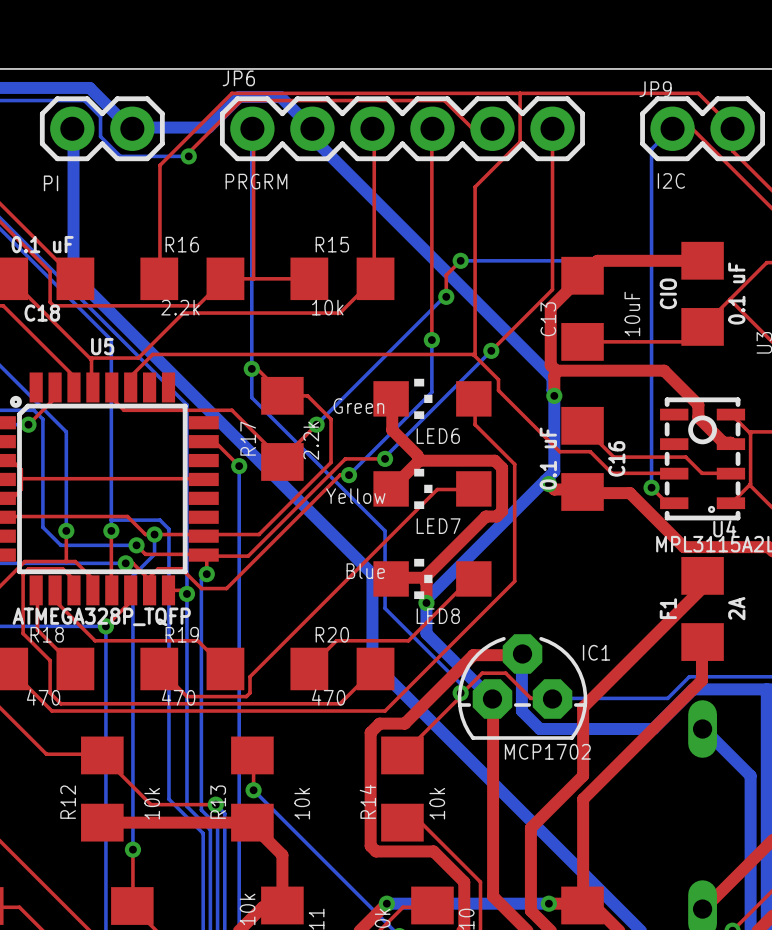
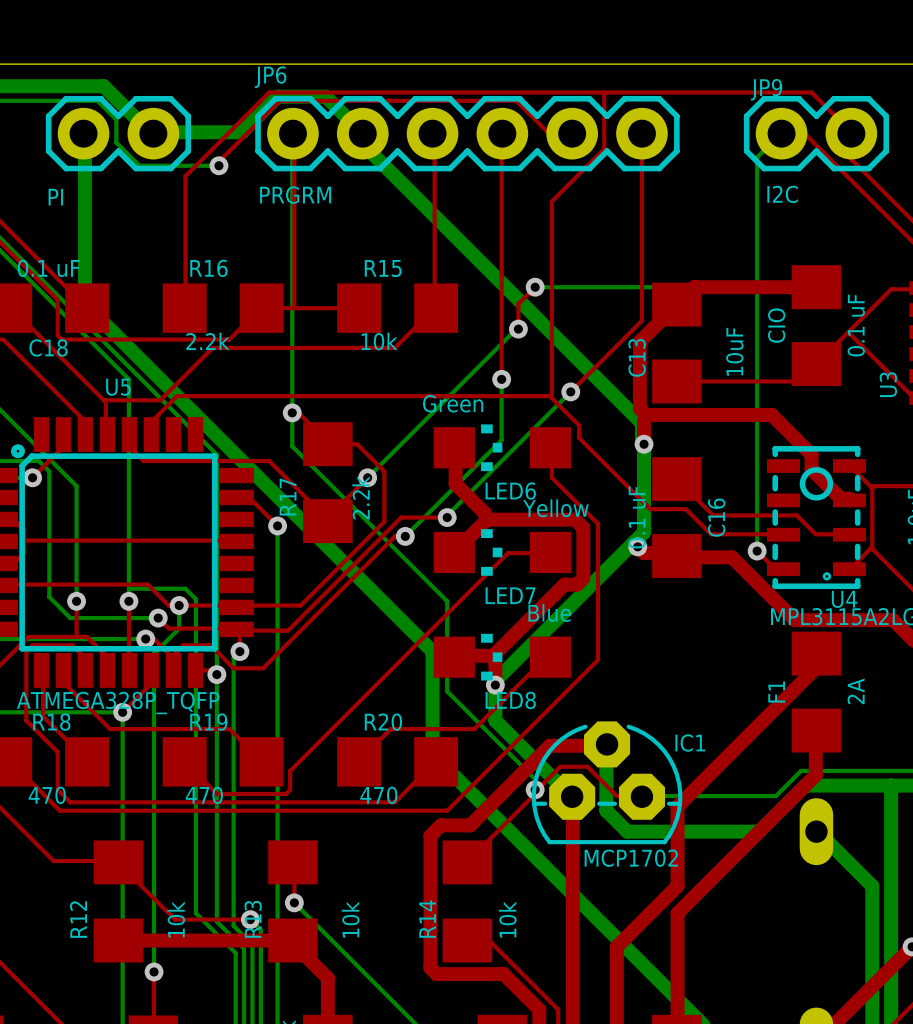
LED6 value position: Green (358, 406) -> Green (453, 403)
LED7 value position: Yellow (355, 496) -> Yellow (555, 508)
LED8 value position: Blue (365, 571) -> Blue (549, 613)

